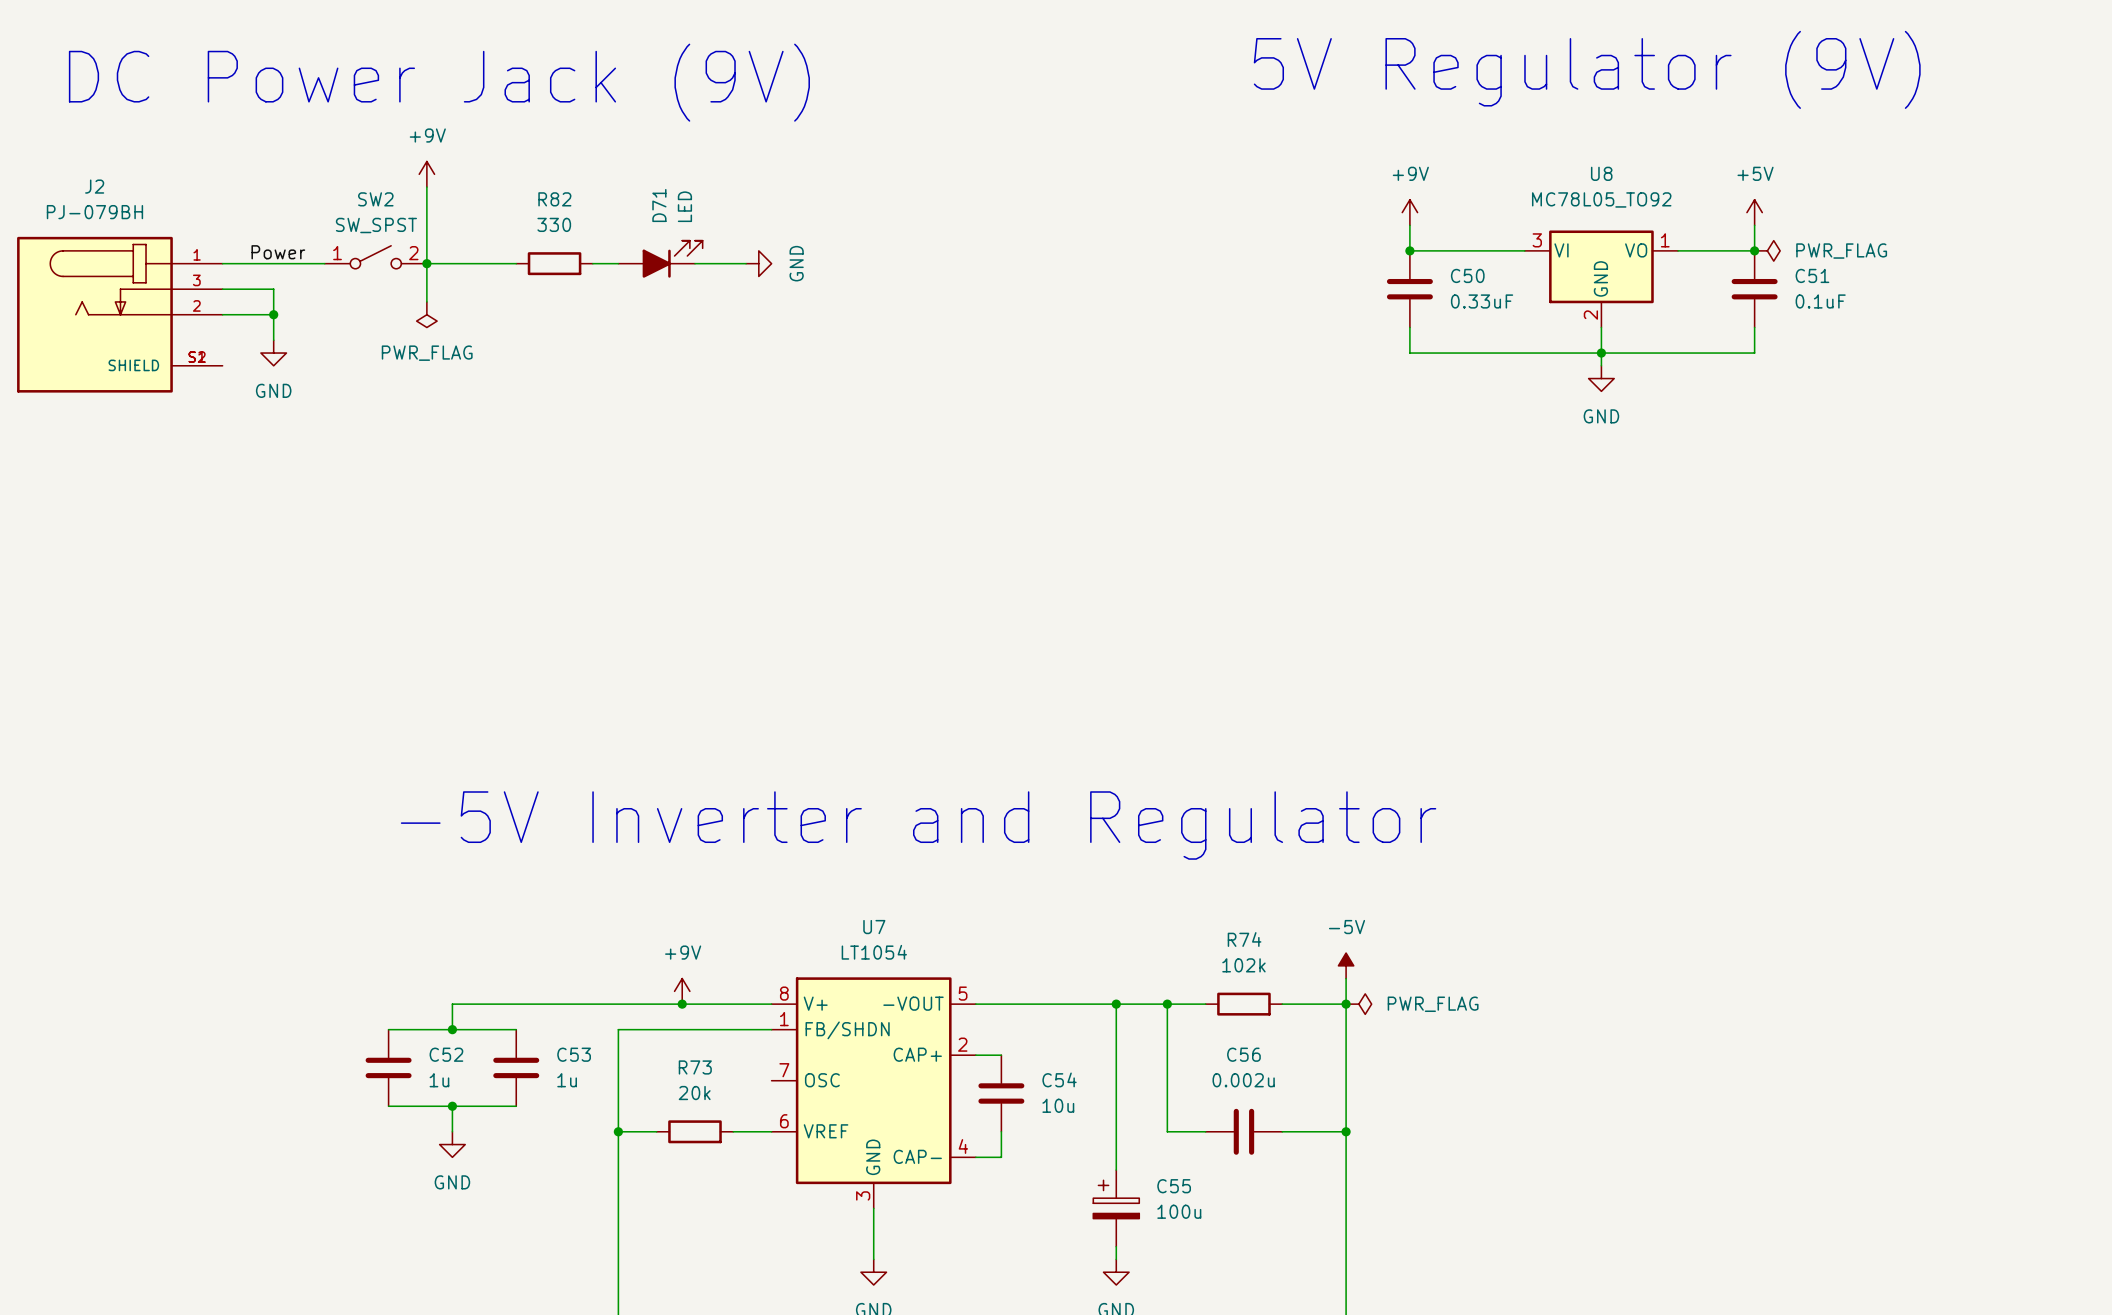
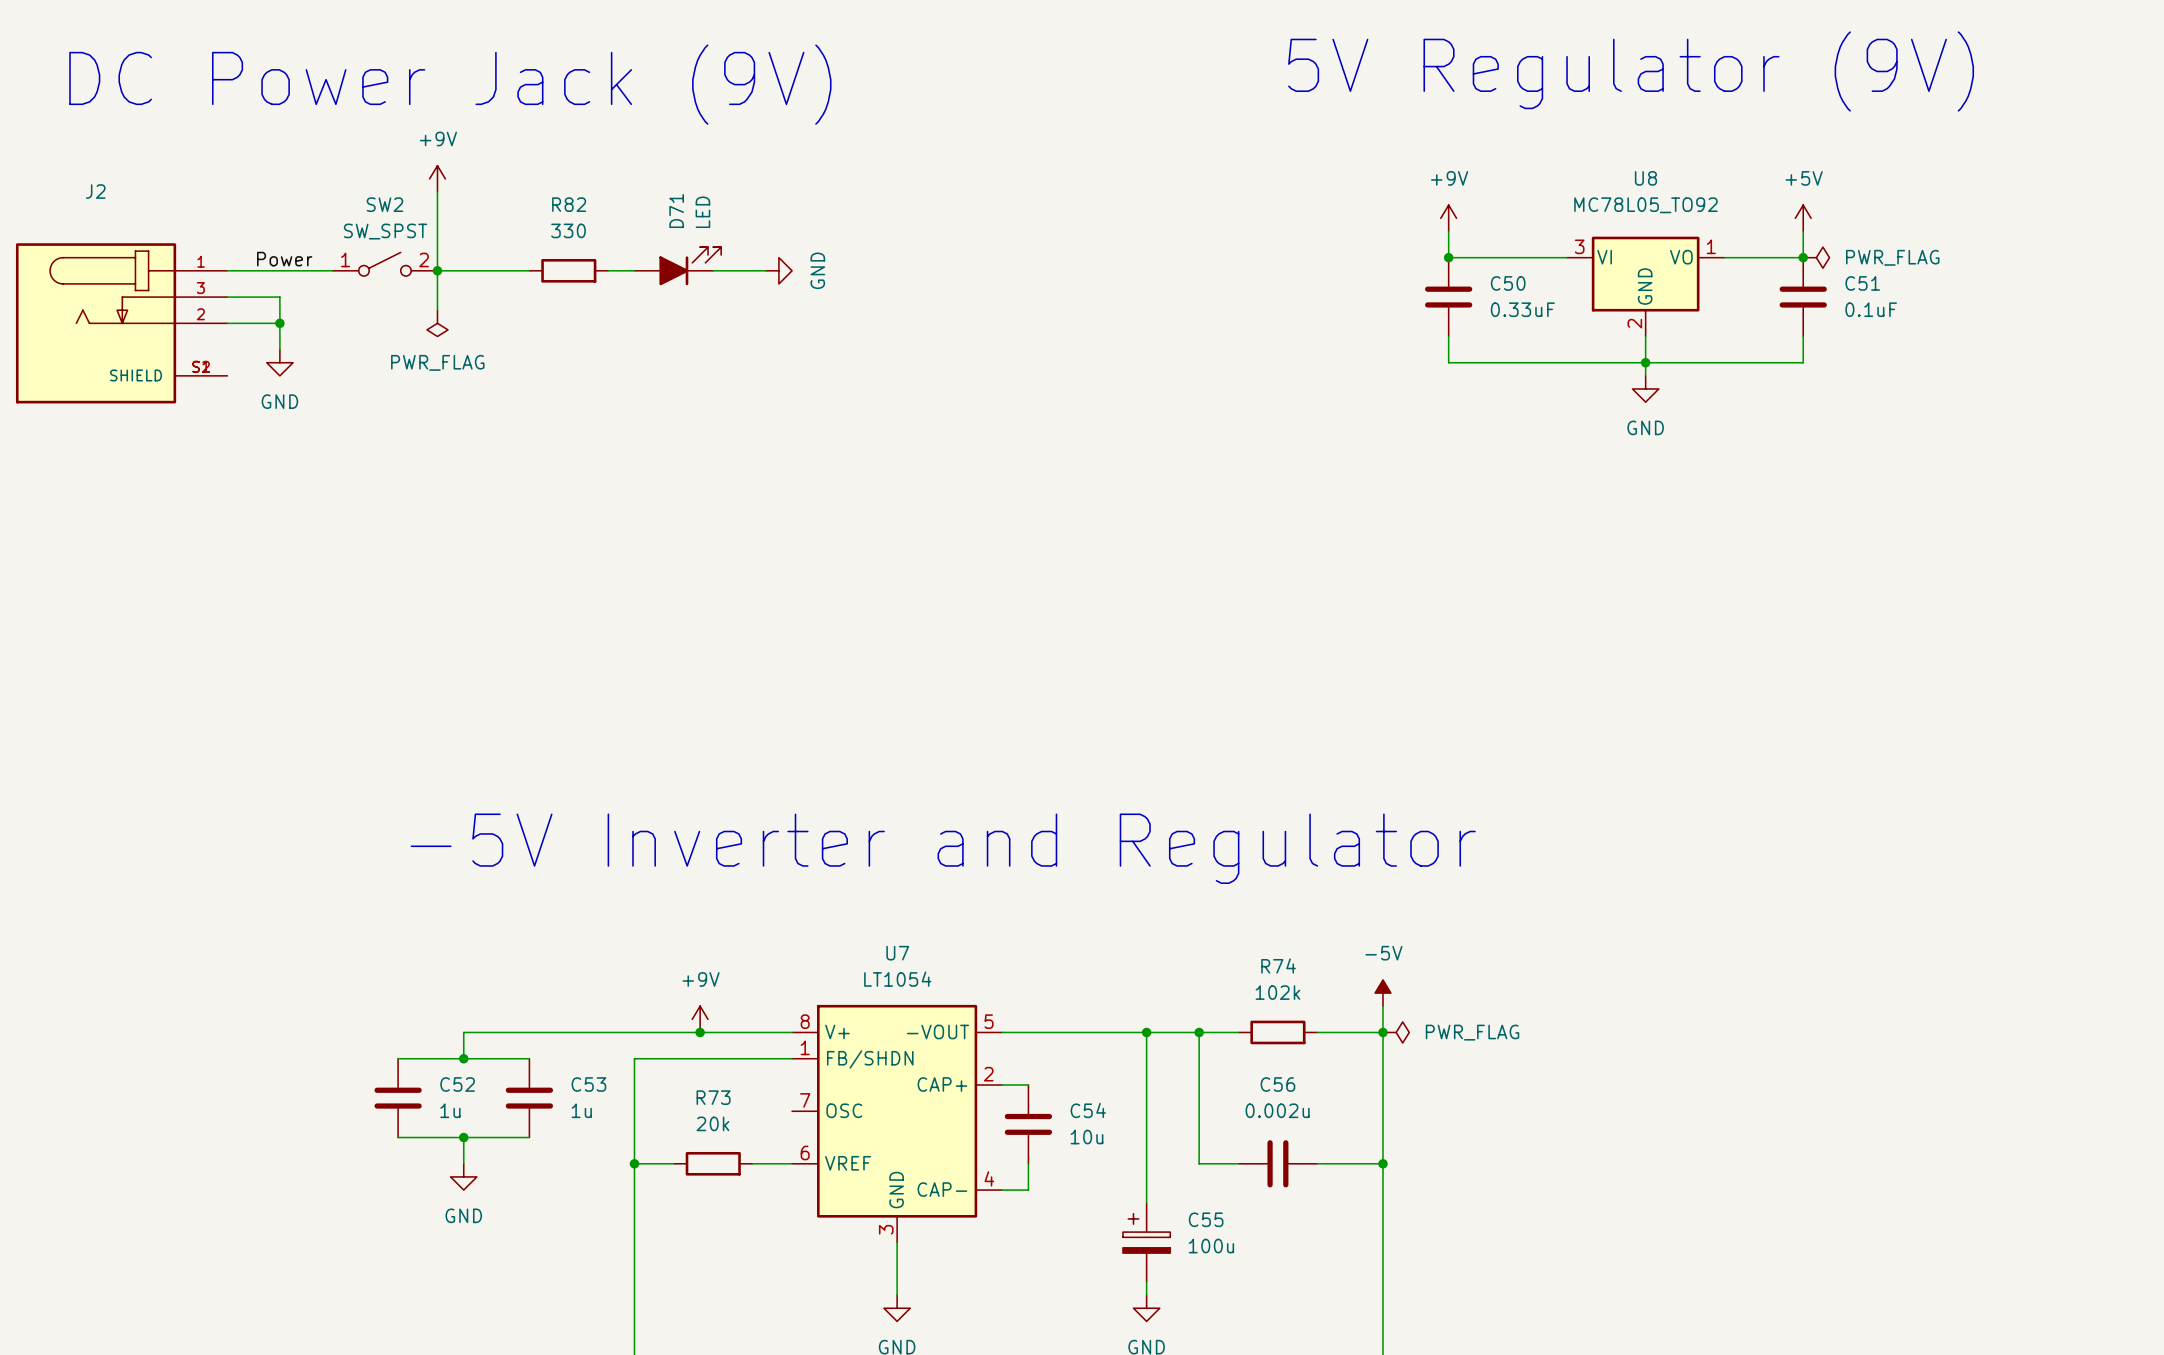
J2 value: PJ-079BH (94, 212) -> none

